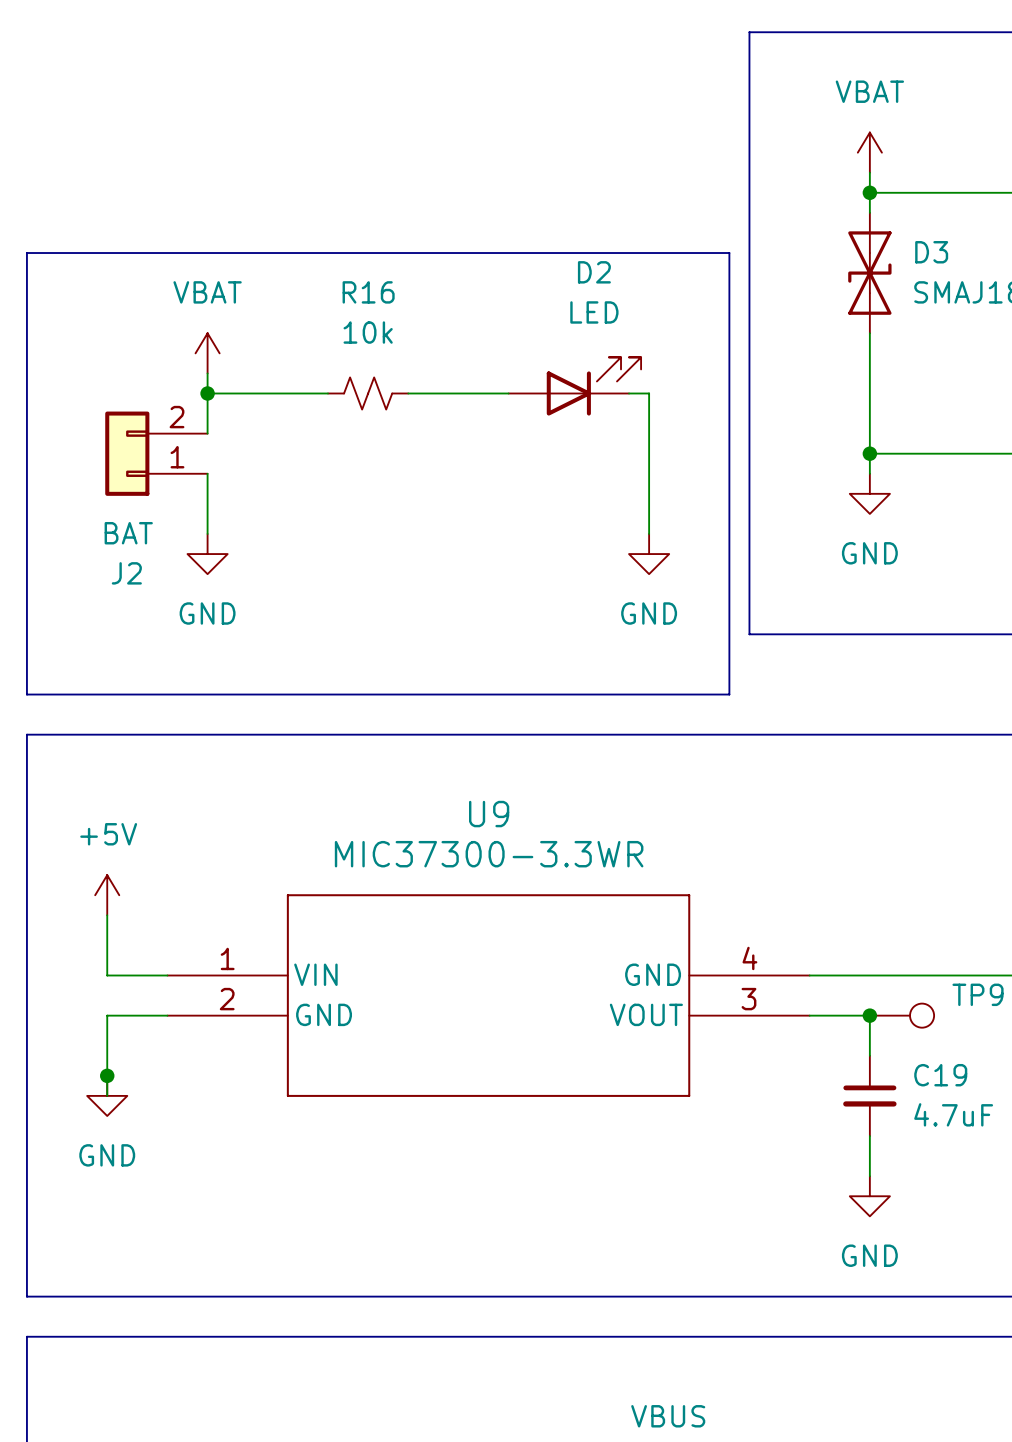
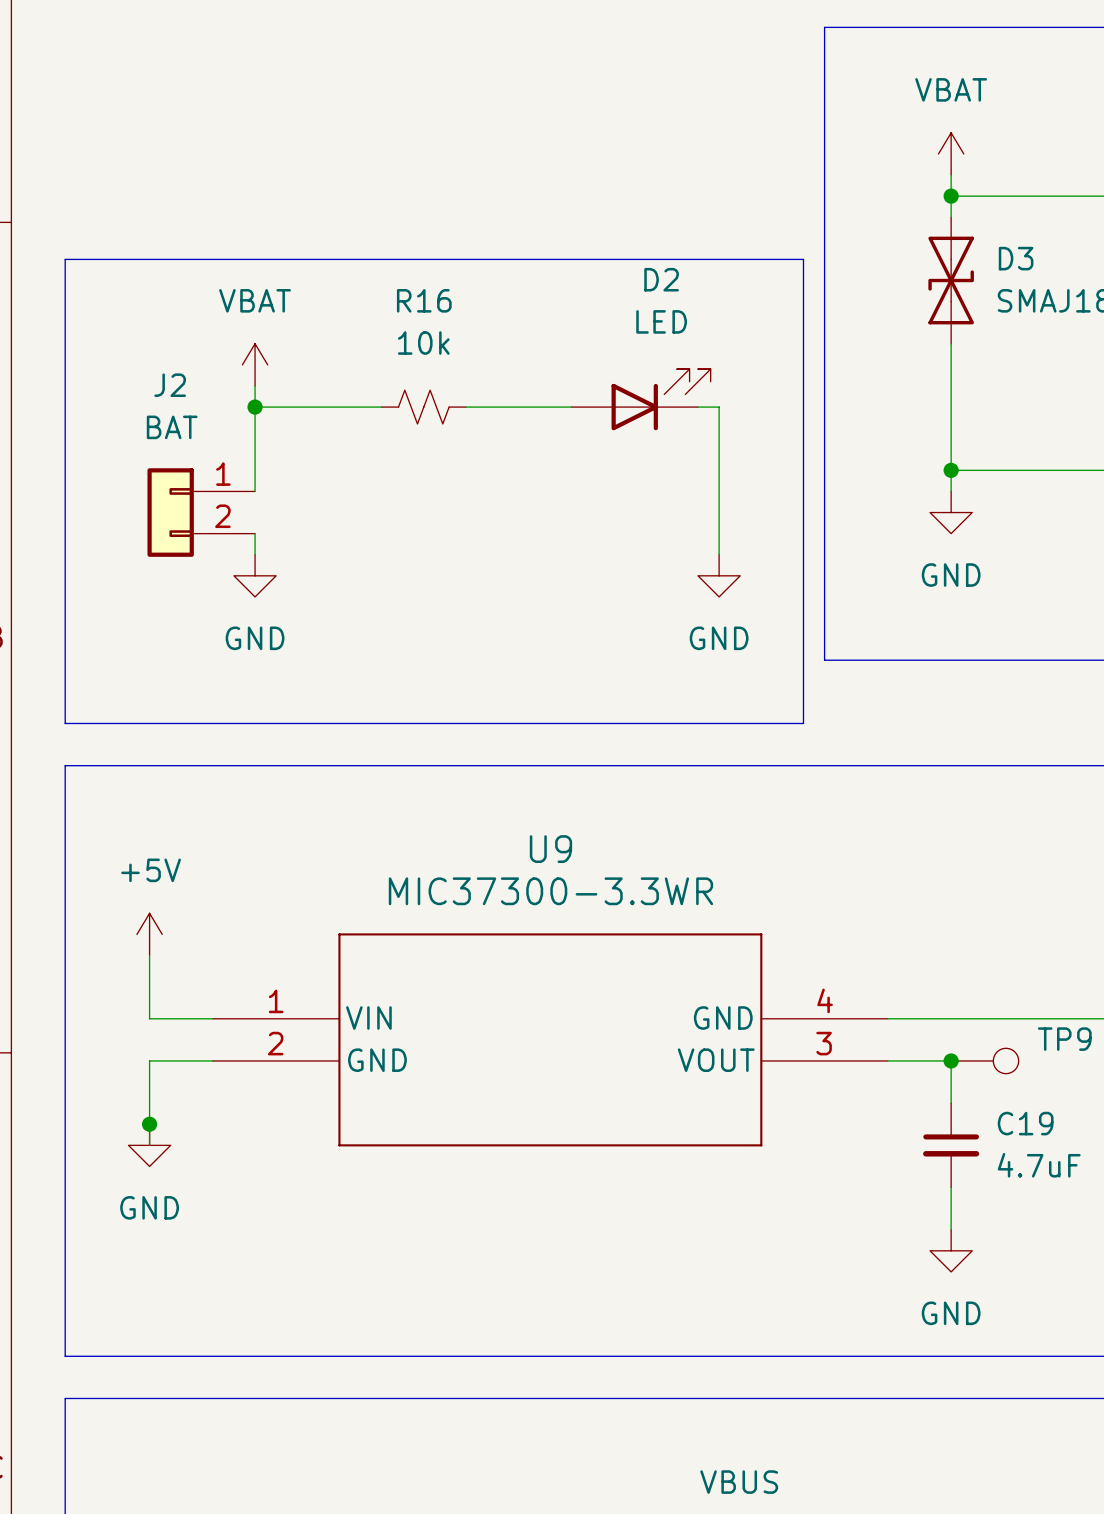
J2 flip: as is (127, 453) -> up-down (170, 512)
wire: (207, 473) (207, 513) -> (255, 491) (255, 449)

